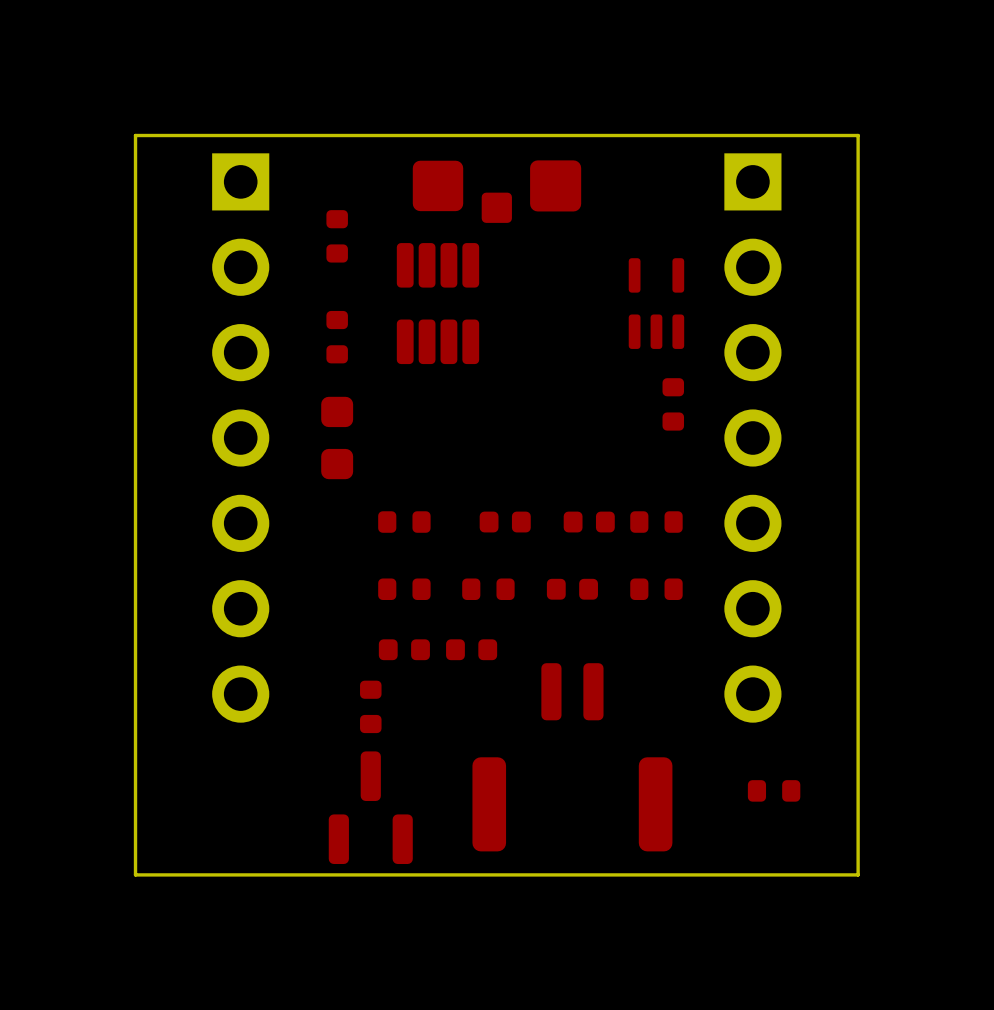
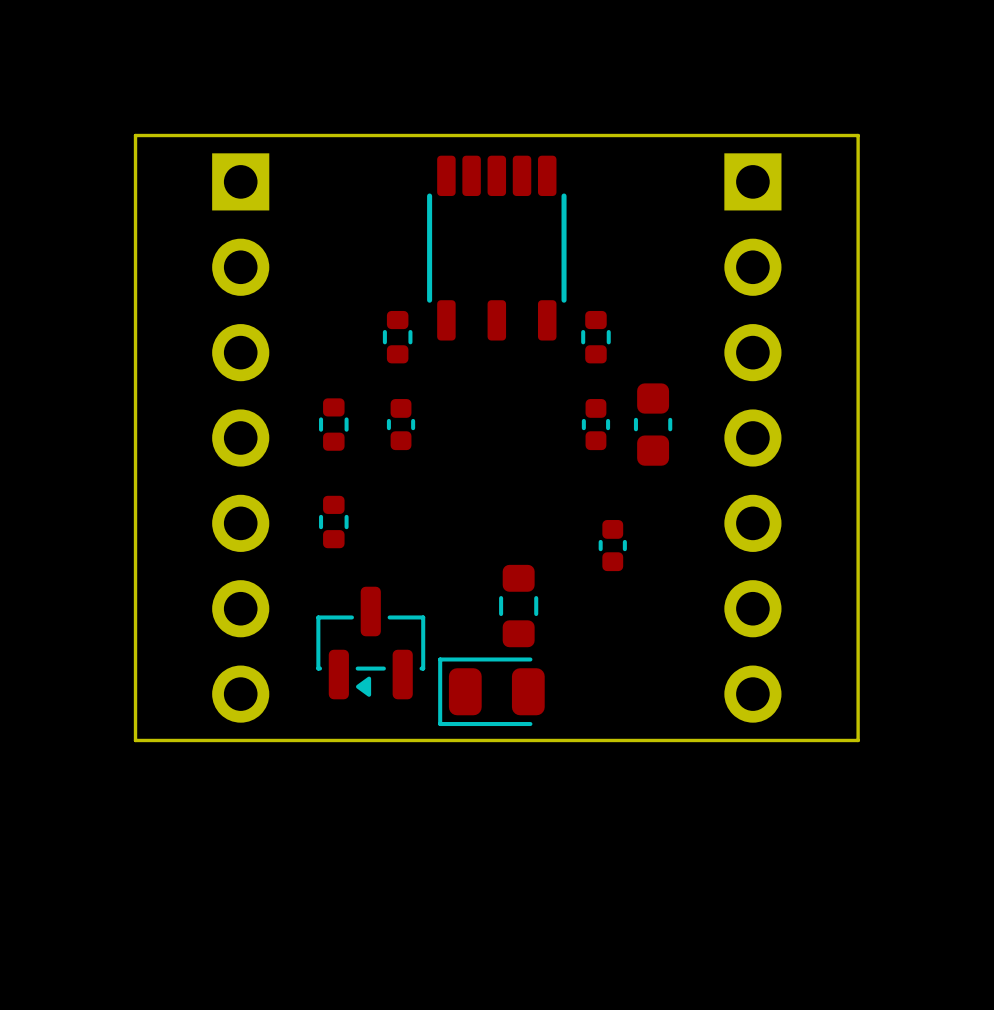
part: (496, 191) -> none
part: (337, 236) -> none
part: none -> (496, 248)
part: (438, 303) -> none
part: (656, 303) -> none
part: (337, 337) -> none
part: none -> (397, 337)
part: none -> (595, 337)
part footprint: [662, 378, 685, 431] -> [633, 383, 673, 466]
part footprint: [321, 396, 354, 480] -> [319, 398, 349, 451]
part: none -> (401, 424)
part: none -> (595, 424)
part: none -> (333, 522)
part: (404, 522) -> none
part: (505, 522) -> none
part: (589, 522) -> none
part: (656, 522) -> none
part: none -> (612, 545)
part: (404, 589) -> none
part: (488, 589) -> none
part: (572, 589) -> none
part: (656, 589) -> none
part: none -> (518, 606)
part: none -> (370, 643)
part: (404, 649) -> none
part: (471, 649) -> none
part: none -> (491, 691)
part: (370, 706) -> none
board edge: (135, 740) (135, 874) (858, 874) (858, 740) -> (135, 740) (858, 740)
part: (572, 757) -> none
part: (774, 790) -> none
part: (370, 807) -> none

